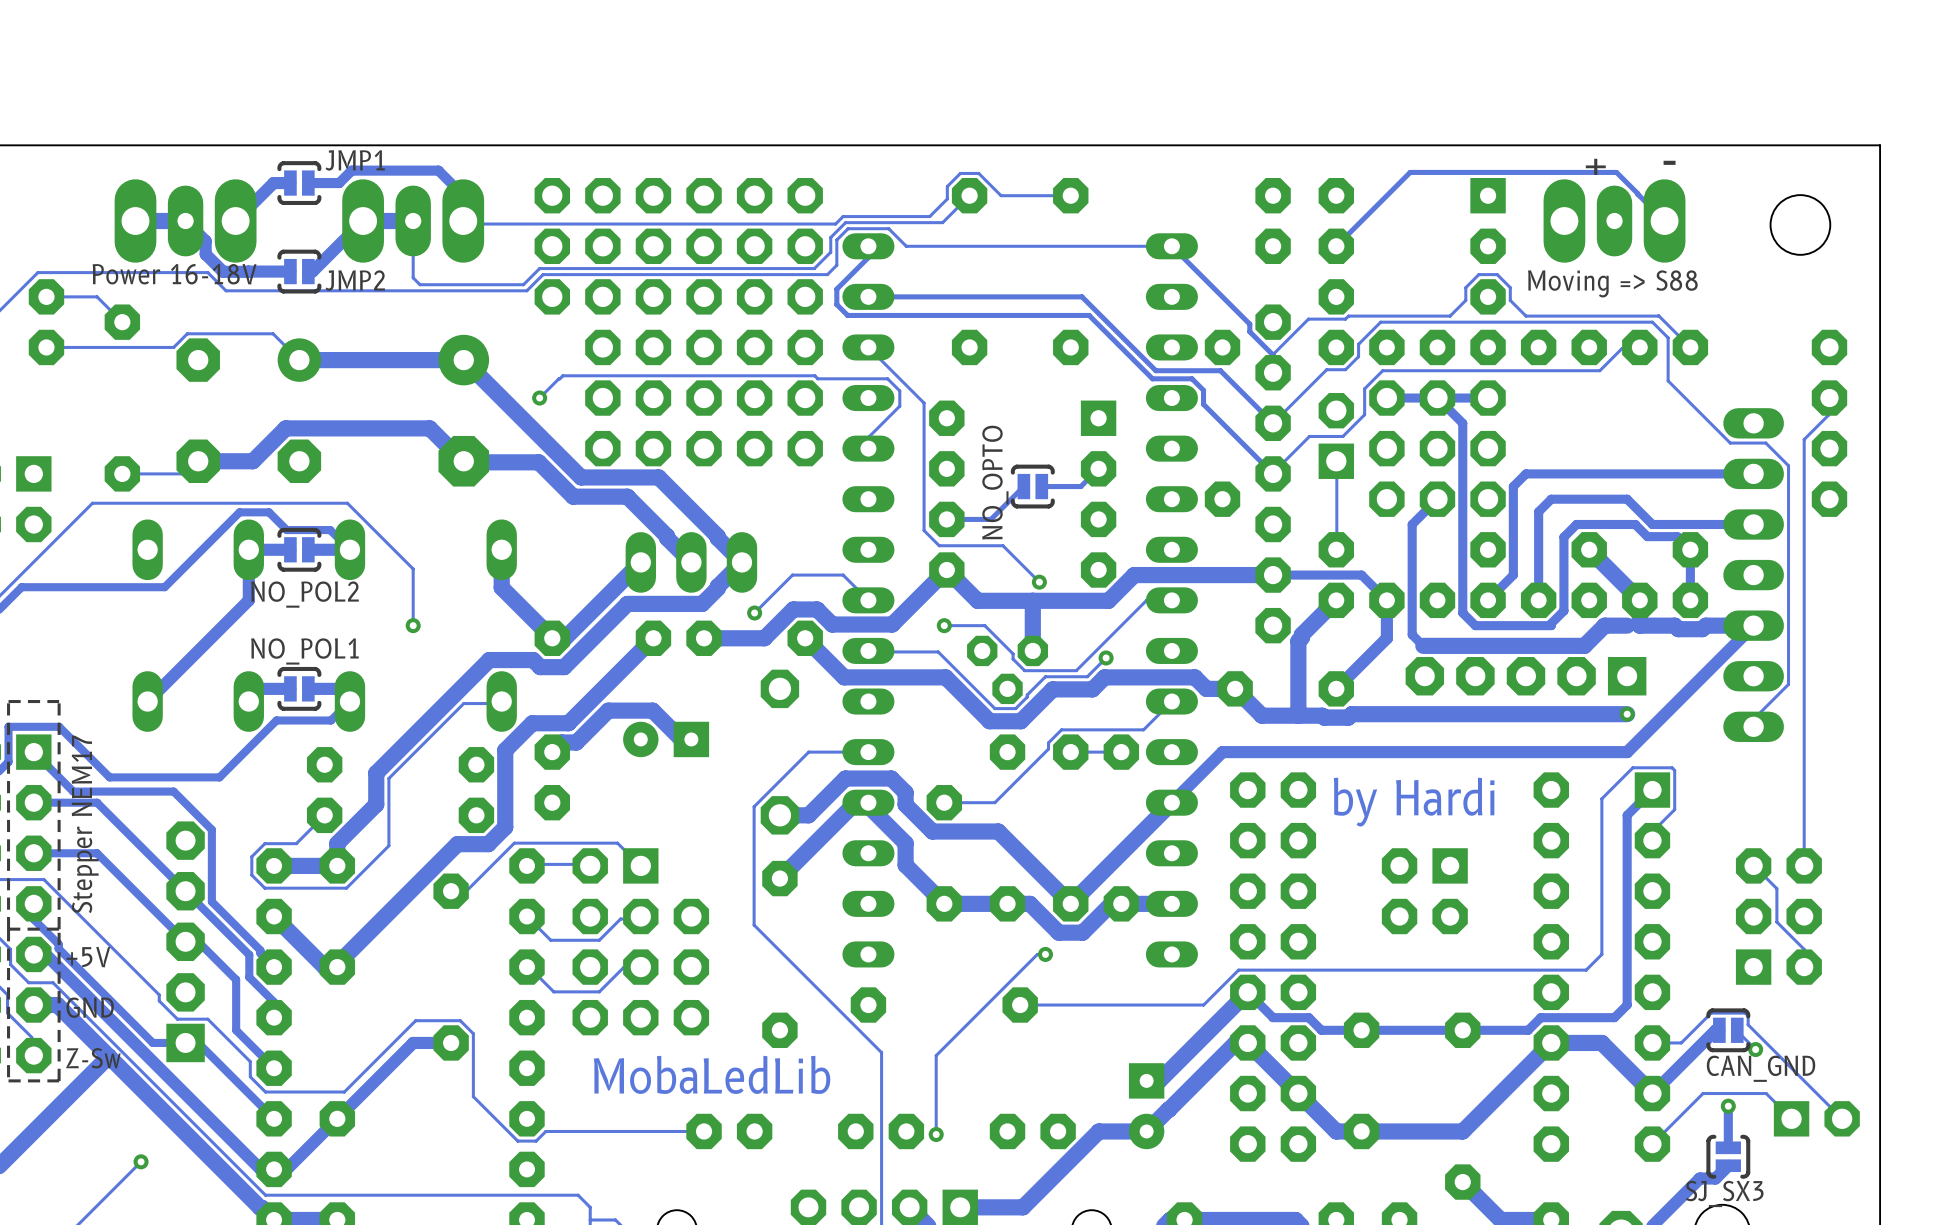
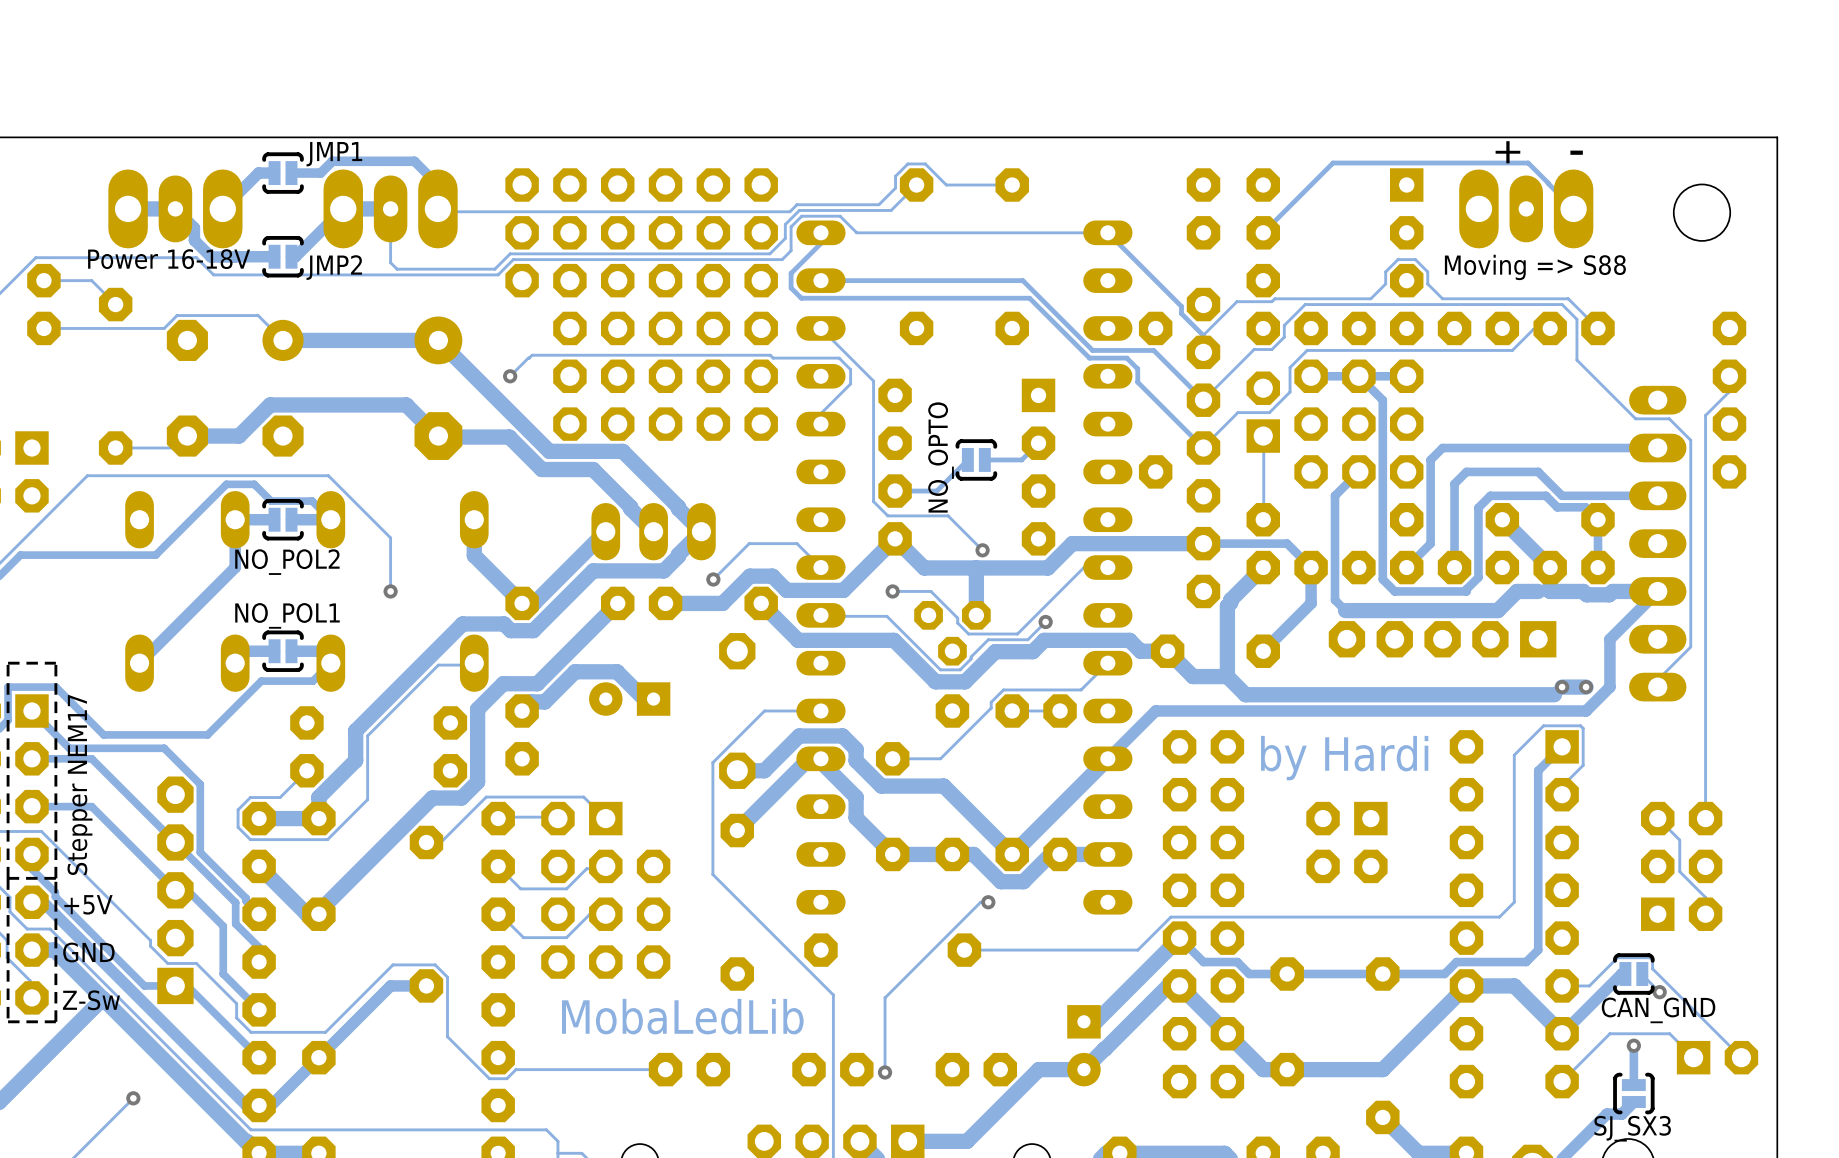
track: (1703, 676) (1652, 726) -> (1609, 639) (1609, 687) (1586, 710) (1538, 710)
track: (1627, 714) (1625, 715) (1298, 715) (1348, 717) (1351, 714) (1627, 714) -> none
via: (1627, 714) -> none
via: none -> (1562, 687)
track: none -> (1586, 687) (1562, 687)
via: none -> (1586, 687)
track: (1644, 734) (1627, 752) -> (1554, 694) (1245, 694) (1227, 676)

